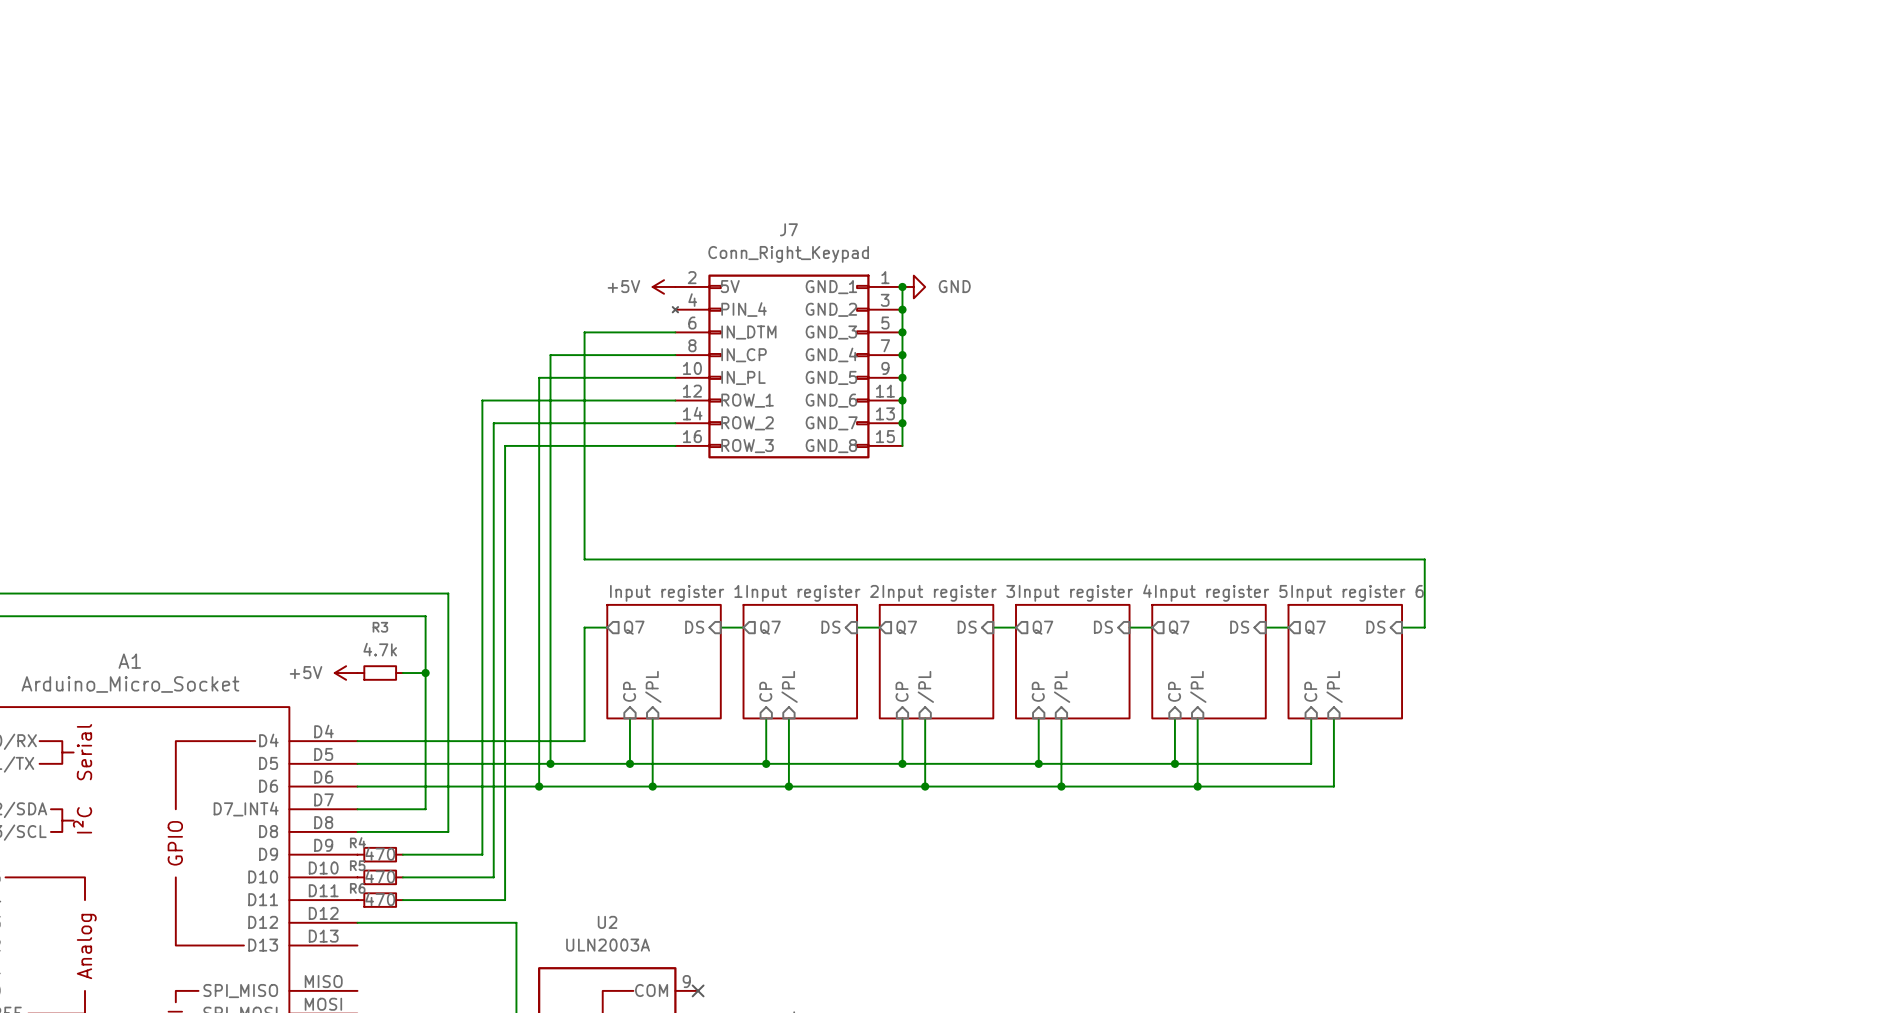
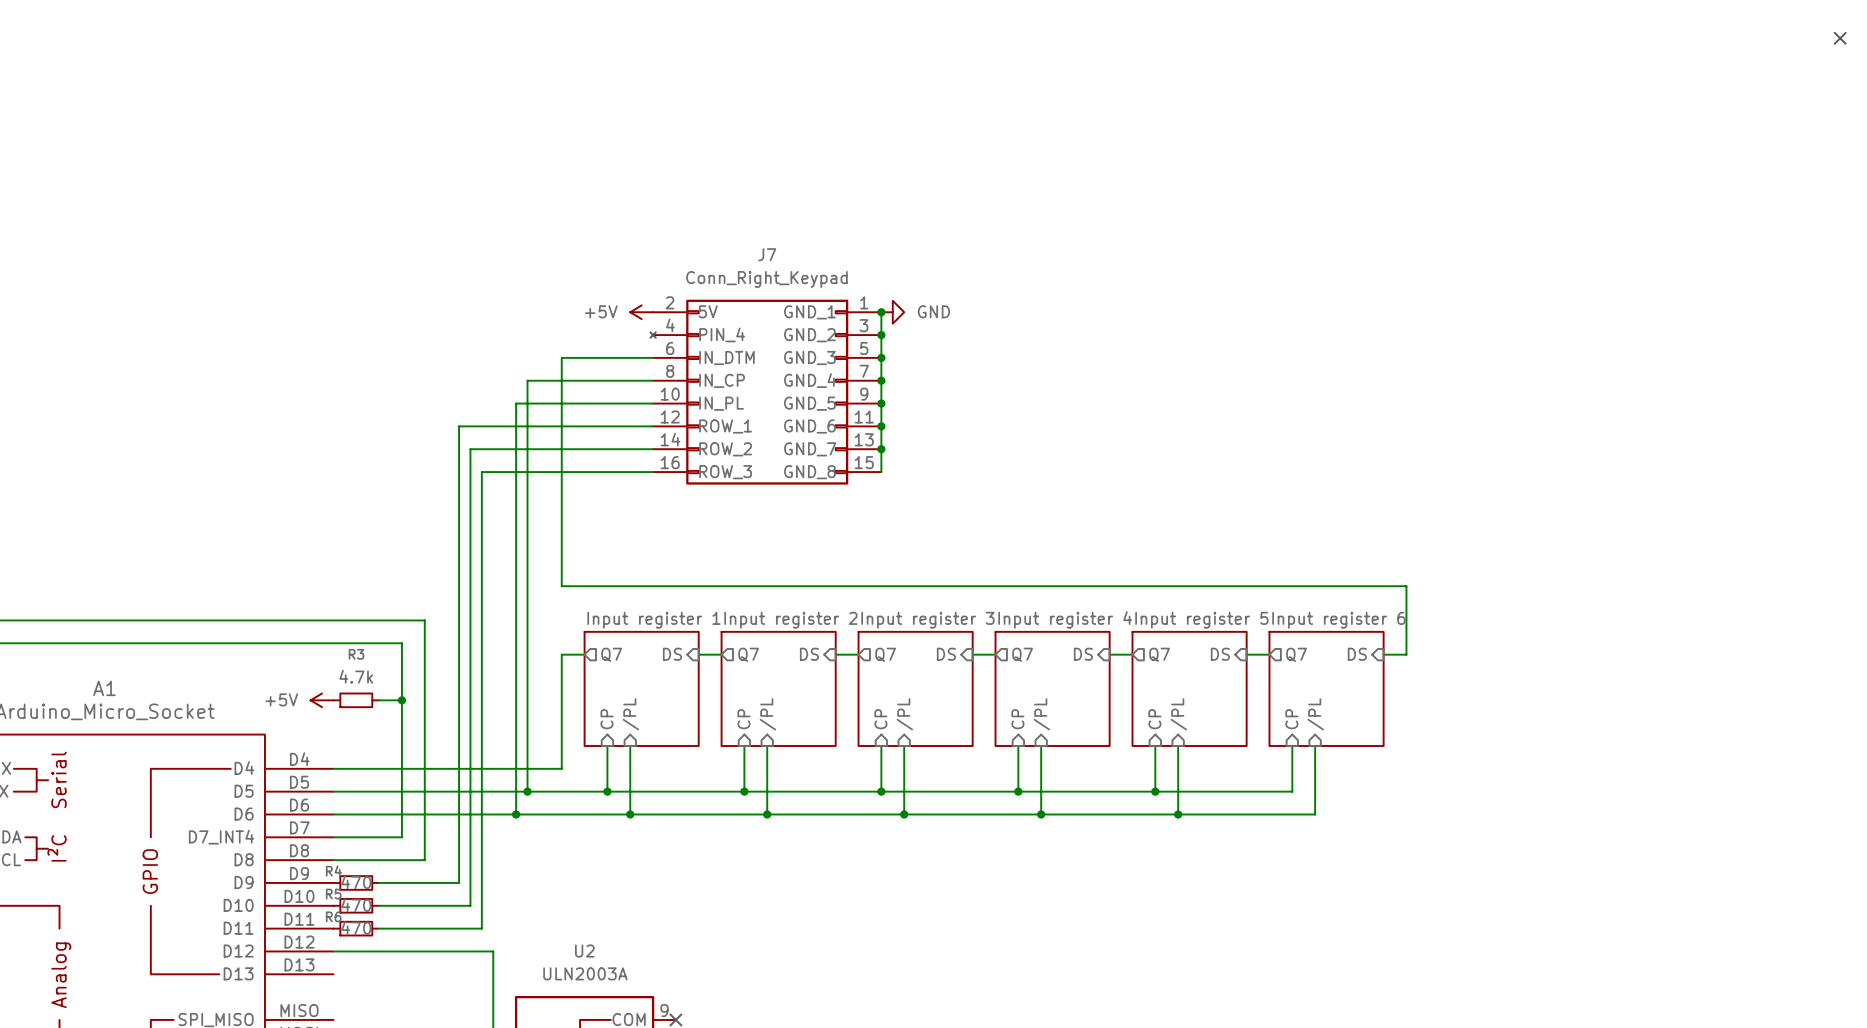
no-connect mark: none -> (1840, 38)

